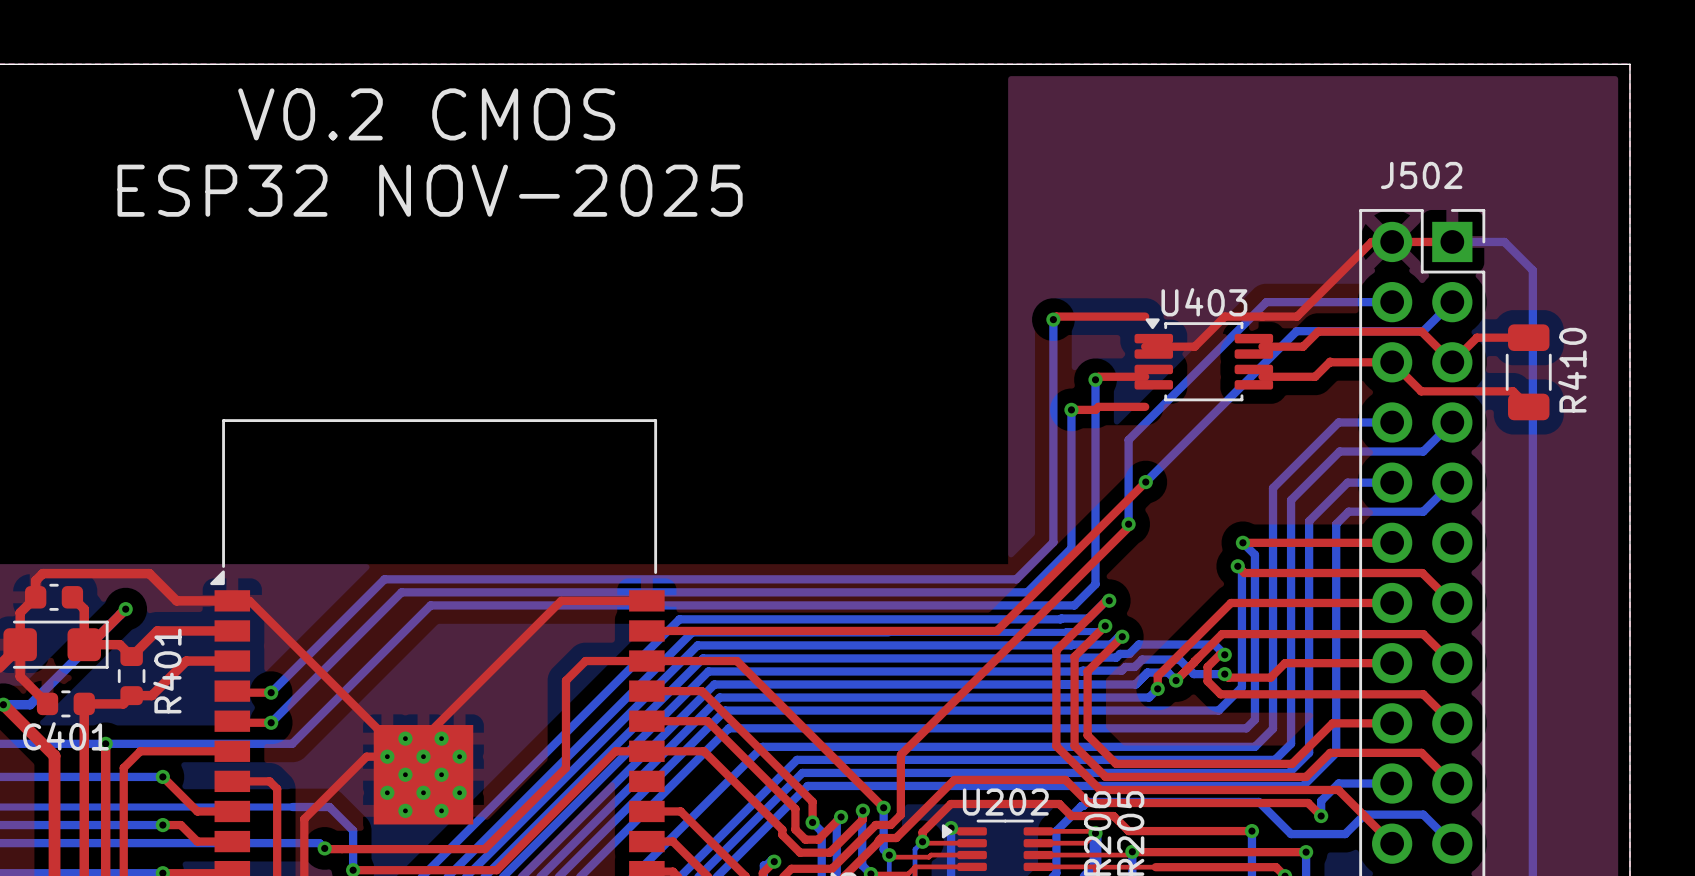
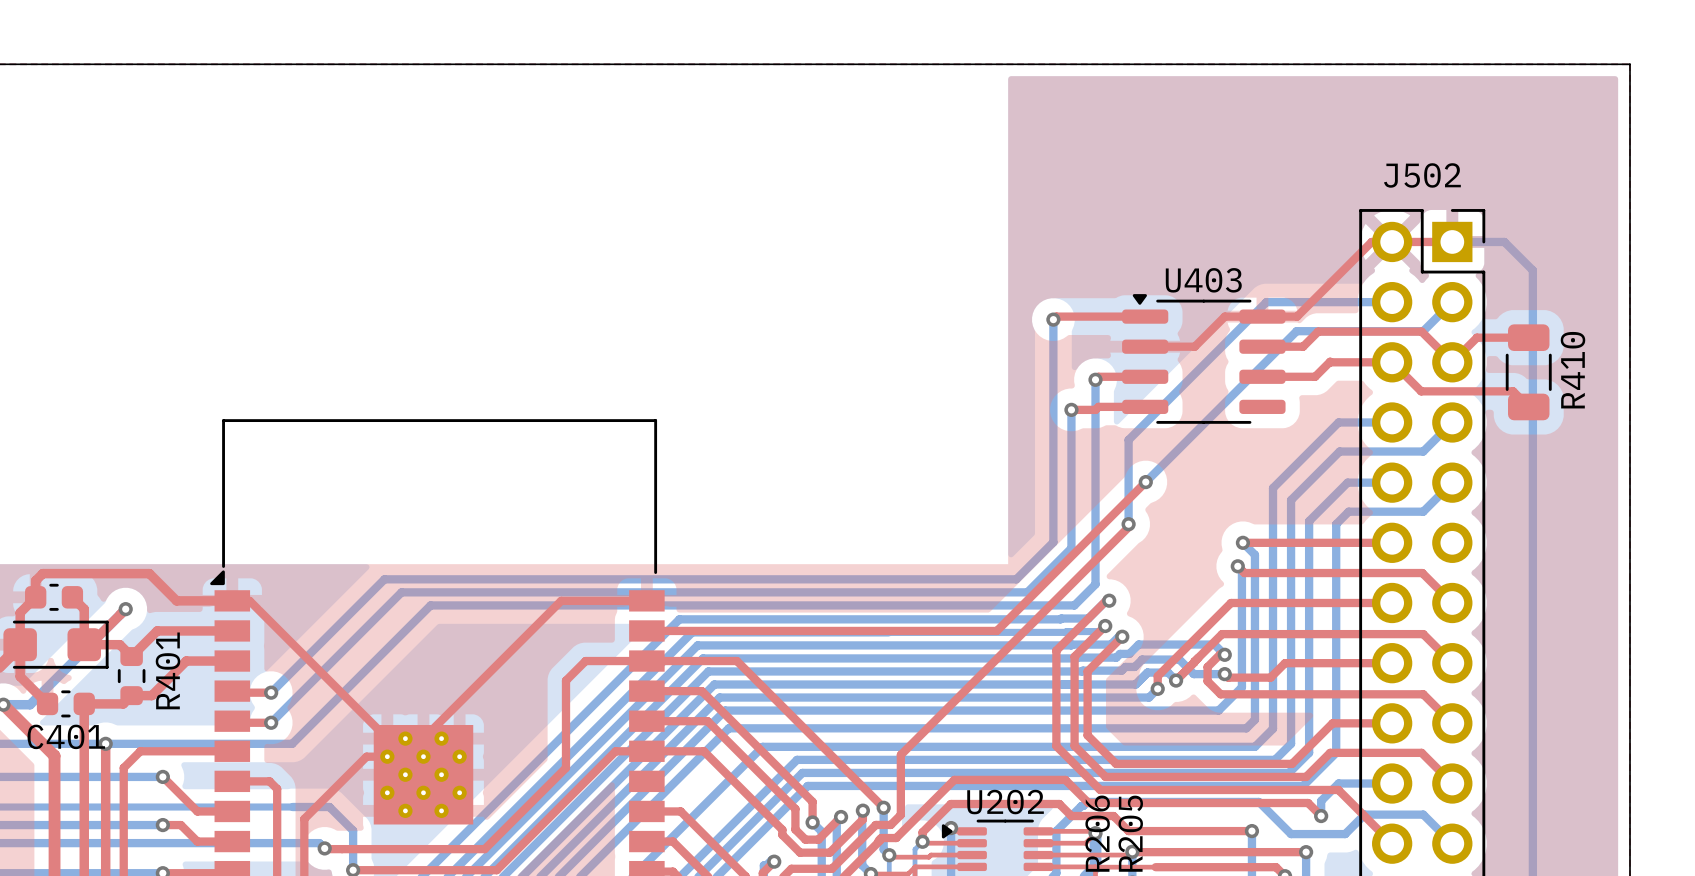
text: V0.2 CMOS (426, 114) -> none
text: ESP32 NOV-2025 (430, 190) -> none
U403 footprint: [1134, 318, 1274, 402] -> [1122, 294, 1286, 424]

